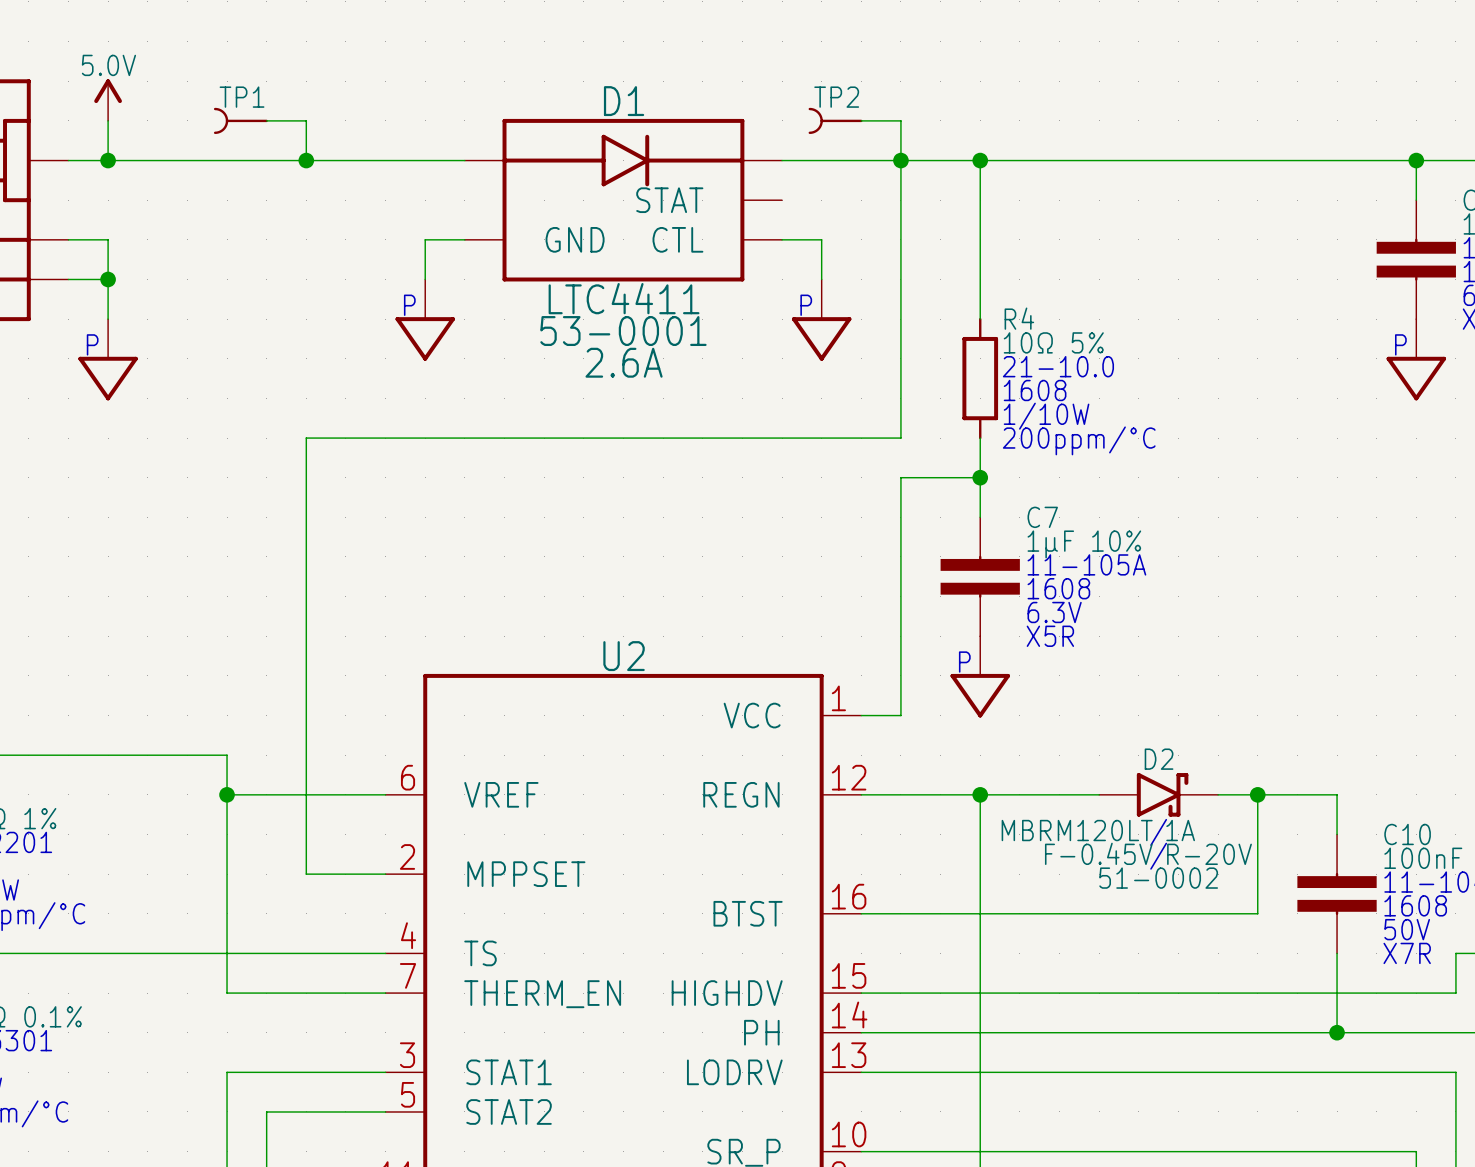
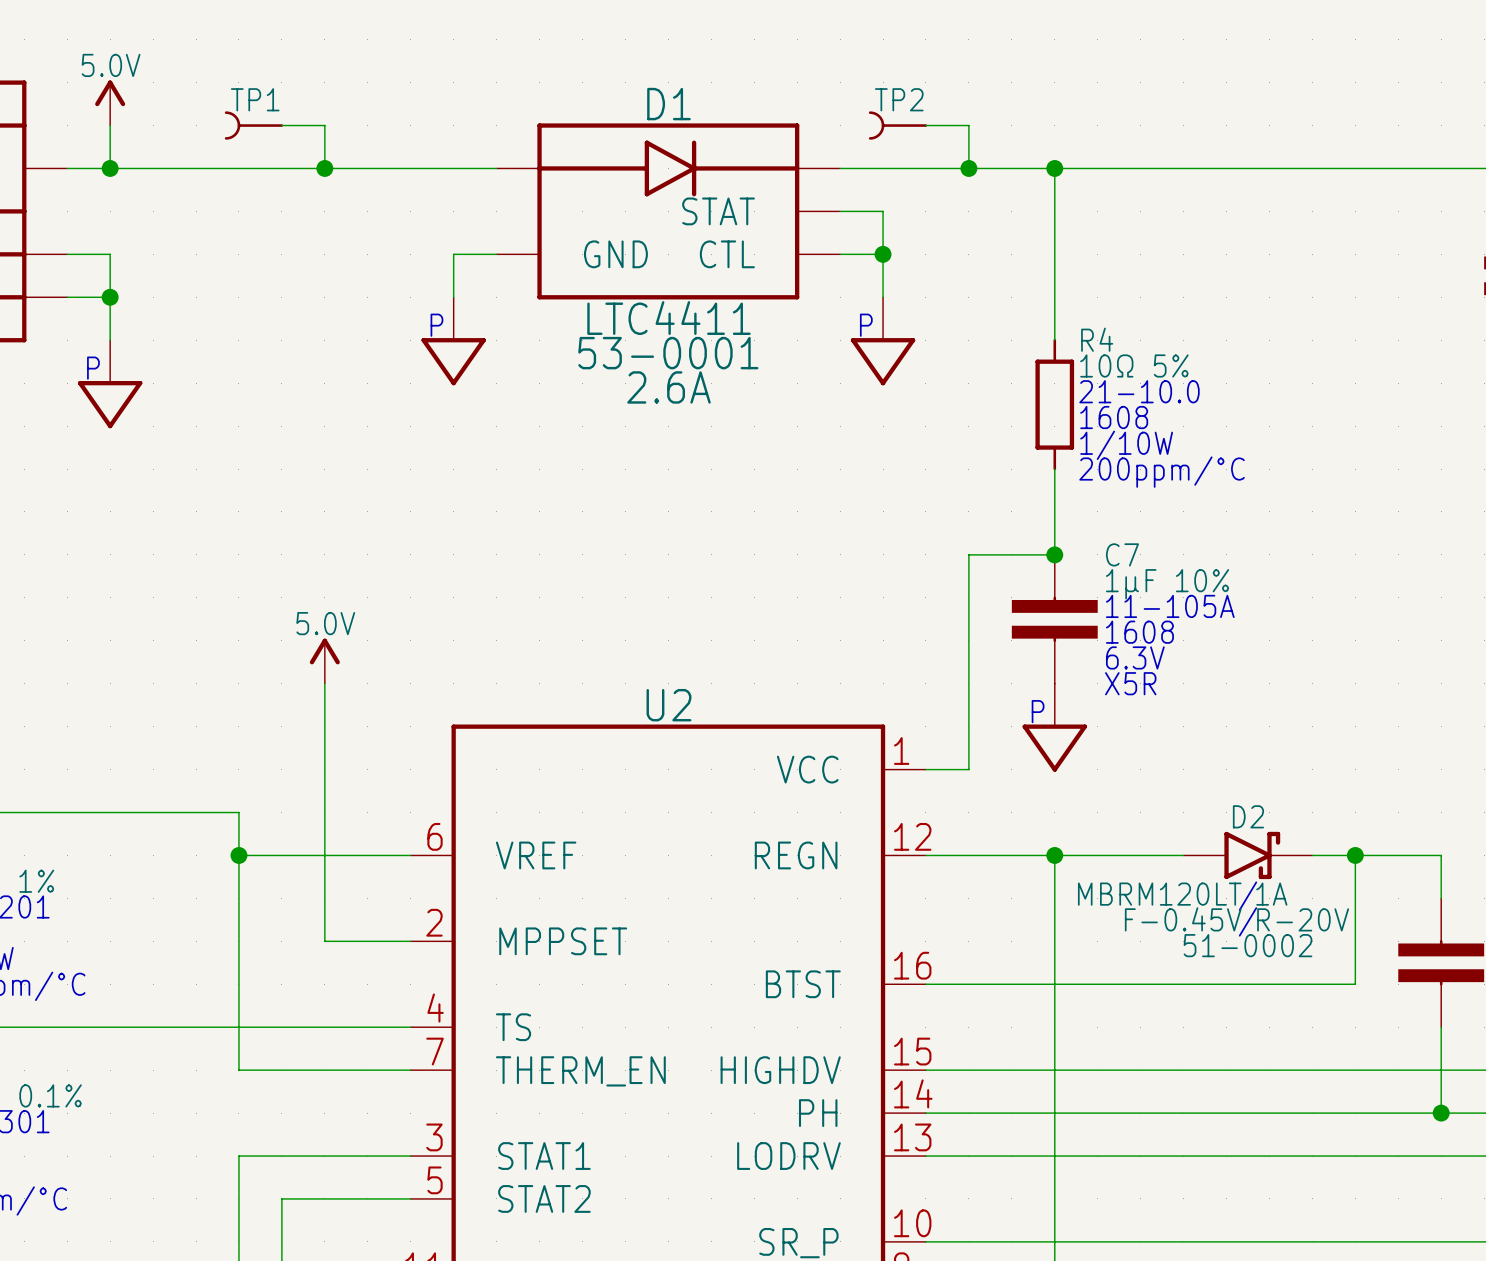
wire: (900, 160) (900, 438) (306, 438) (306, 636) -> none
wire: none -> (840, 211) (883, 211) (883, 254)
junction: none -> (883, 254)
wire: (980, 477) (900, 477) (900, 517) -> (1054, 554) (968, 554)
junction position: (980, 477) -> (1054, 554)
power symbol: none -> 5.0V (324, 661)

